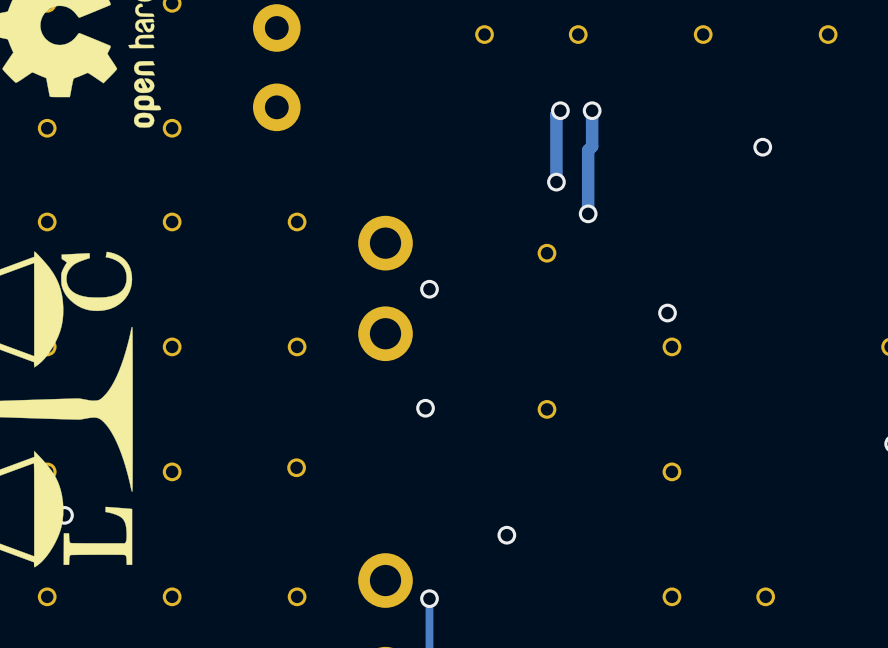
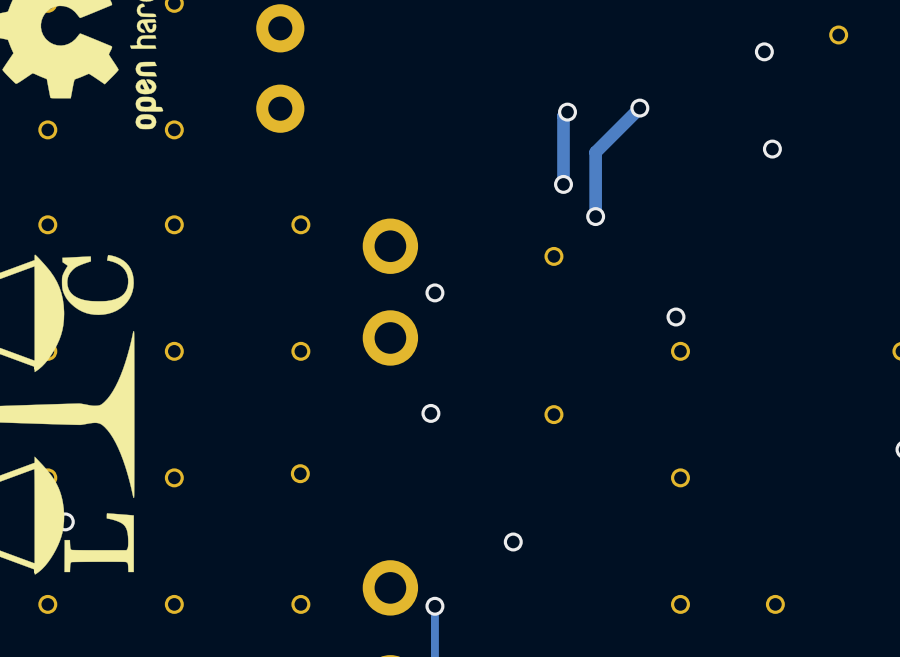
part: (484, 34) -> none
part: (578, 34) -> none
part: (703, 34) -> none
via: none -> (764, 51)
track: (592, 110) (592, 146) -> (639, 108) (599, 148)
via position: (592, 110) -> (639, 108)

